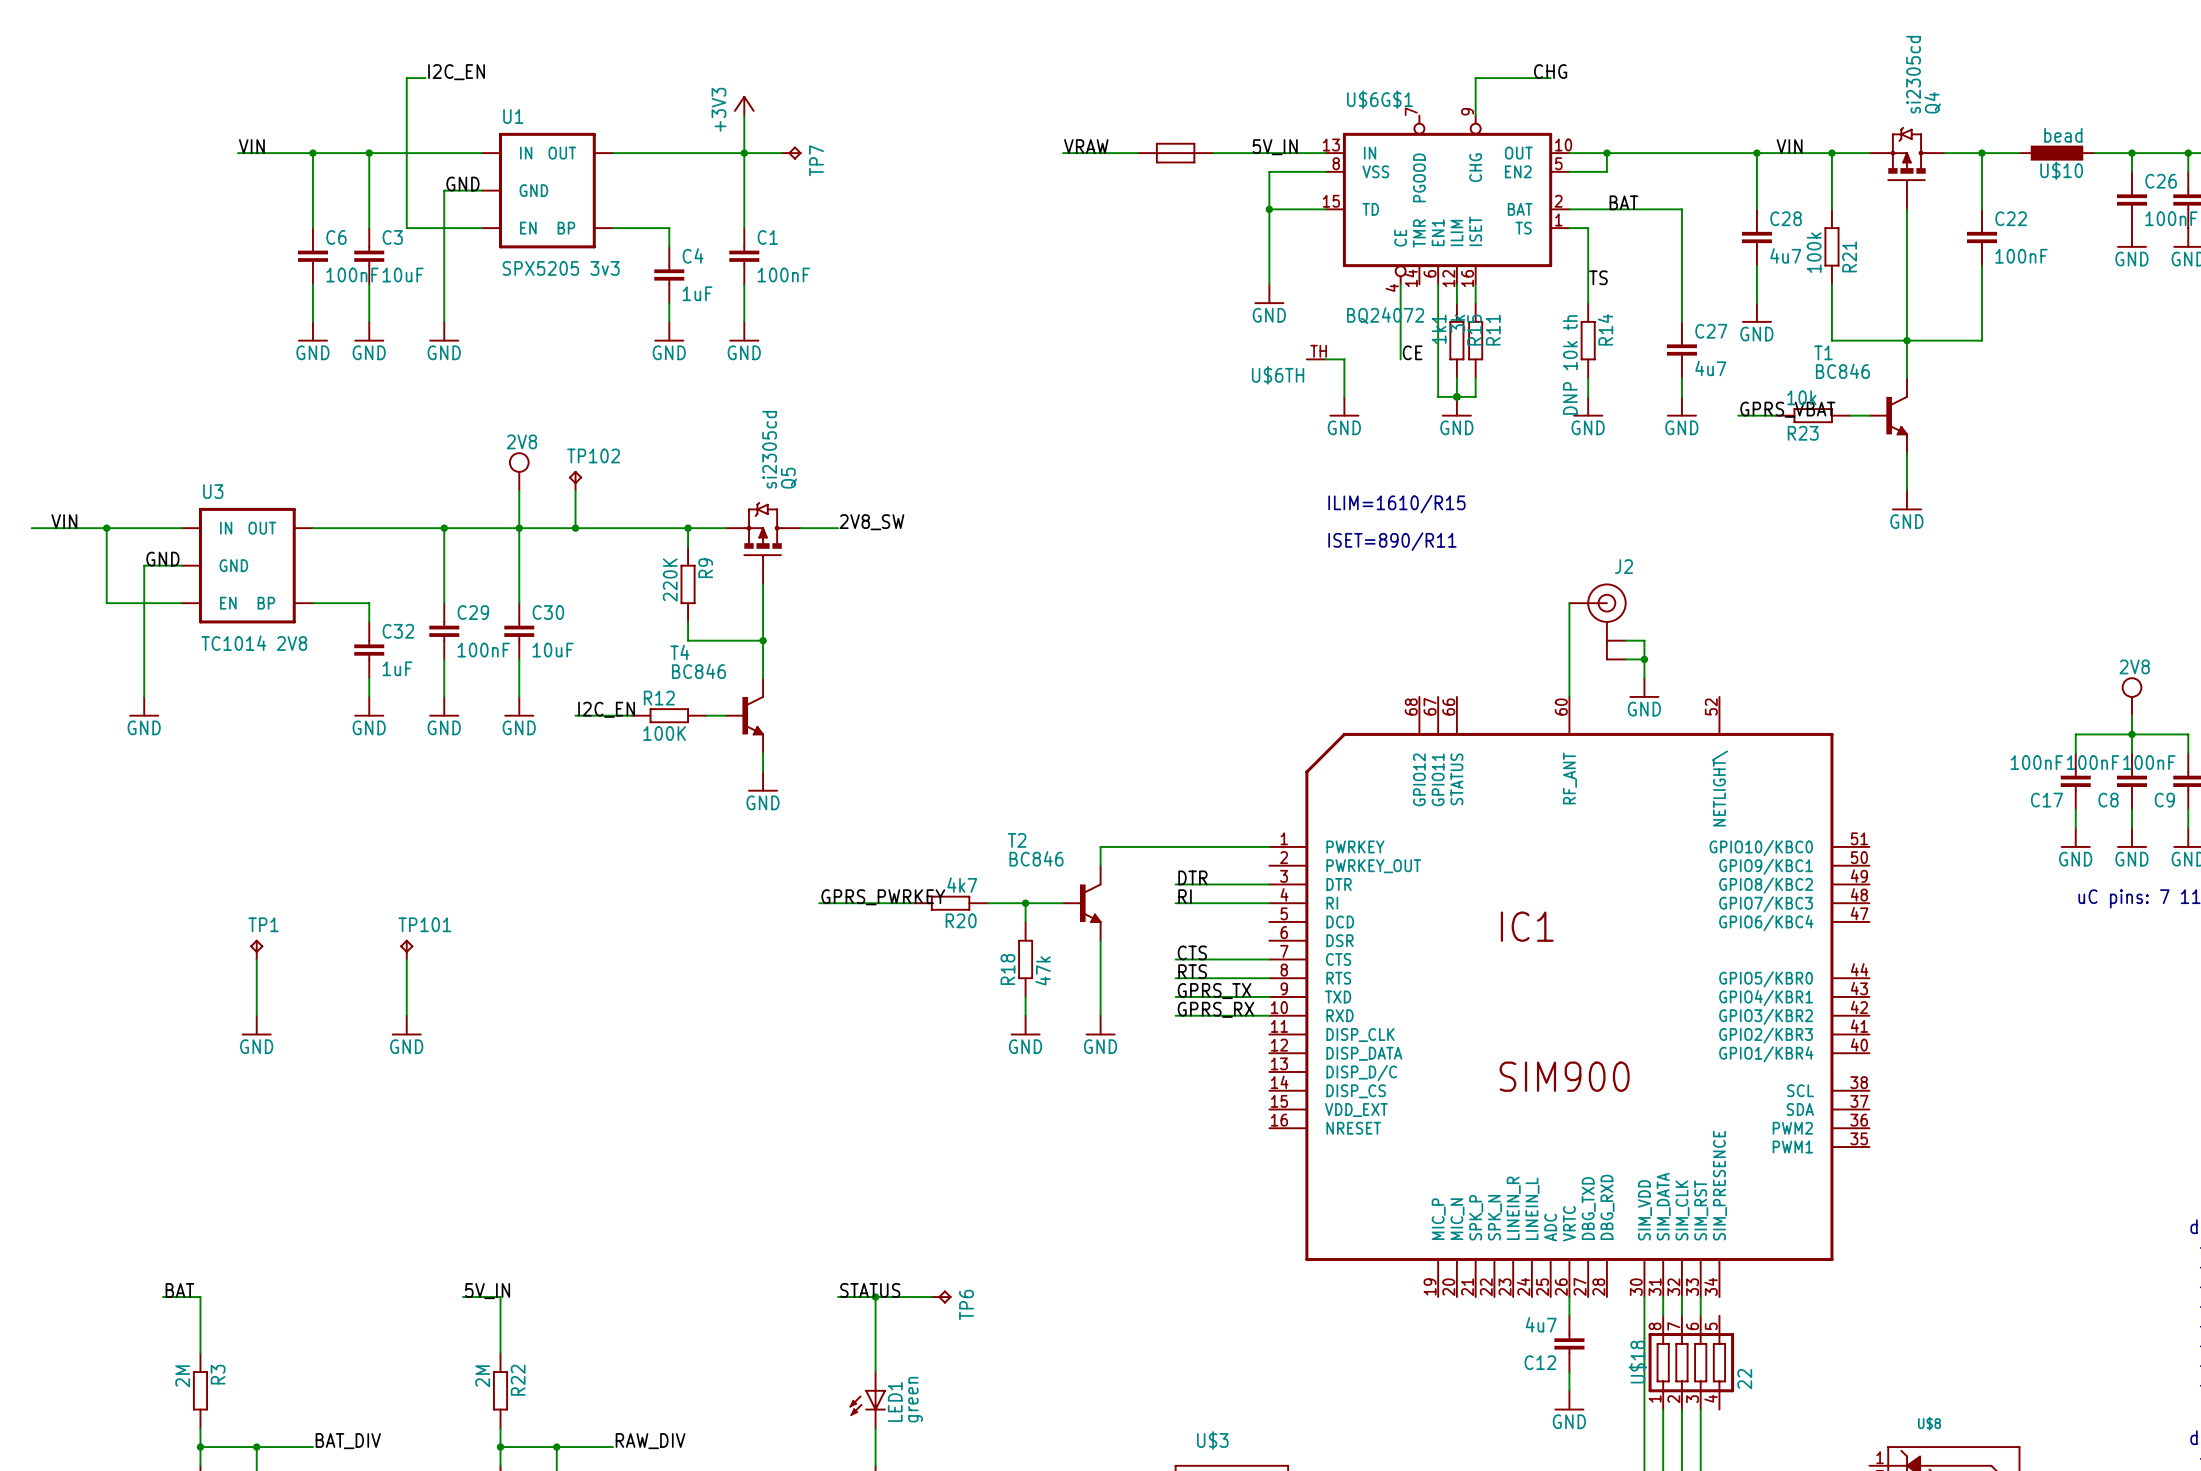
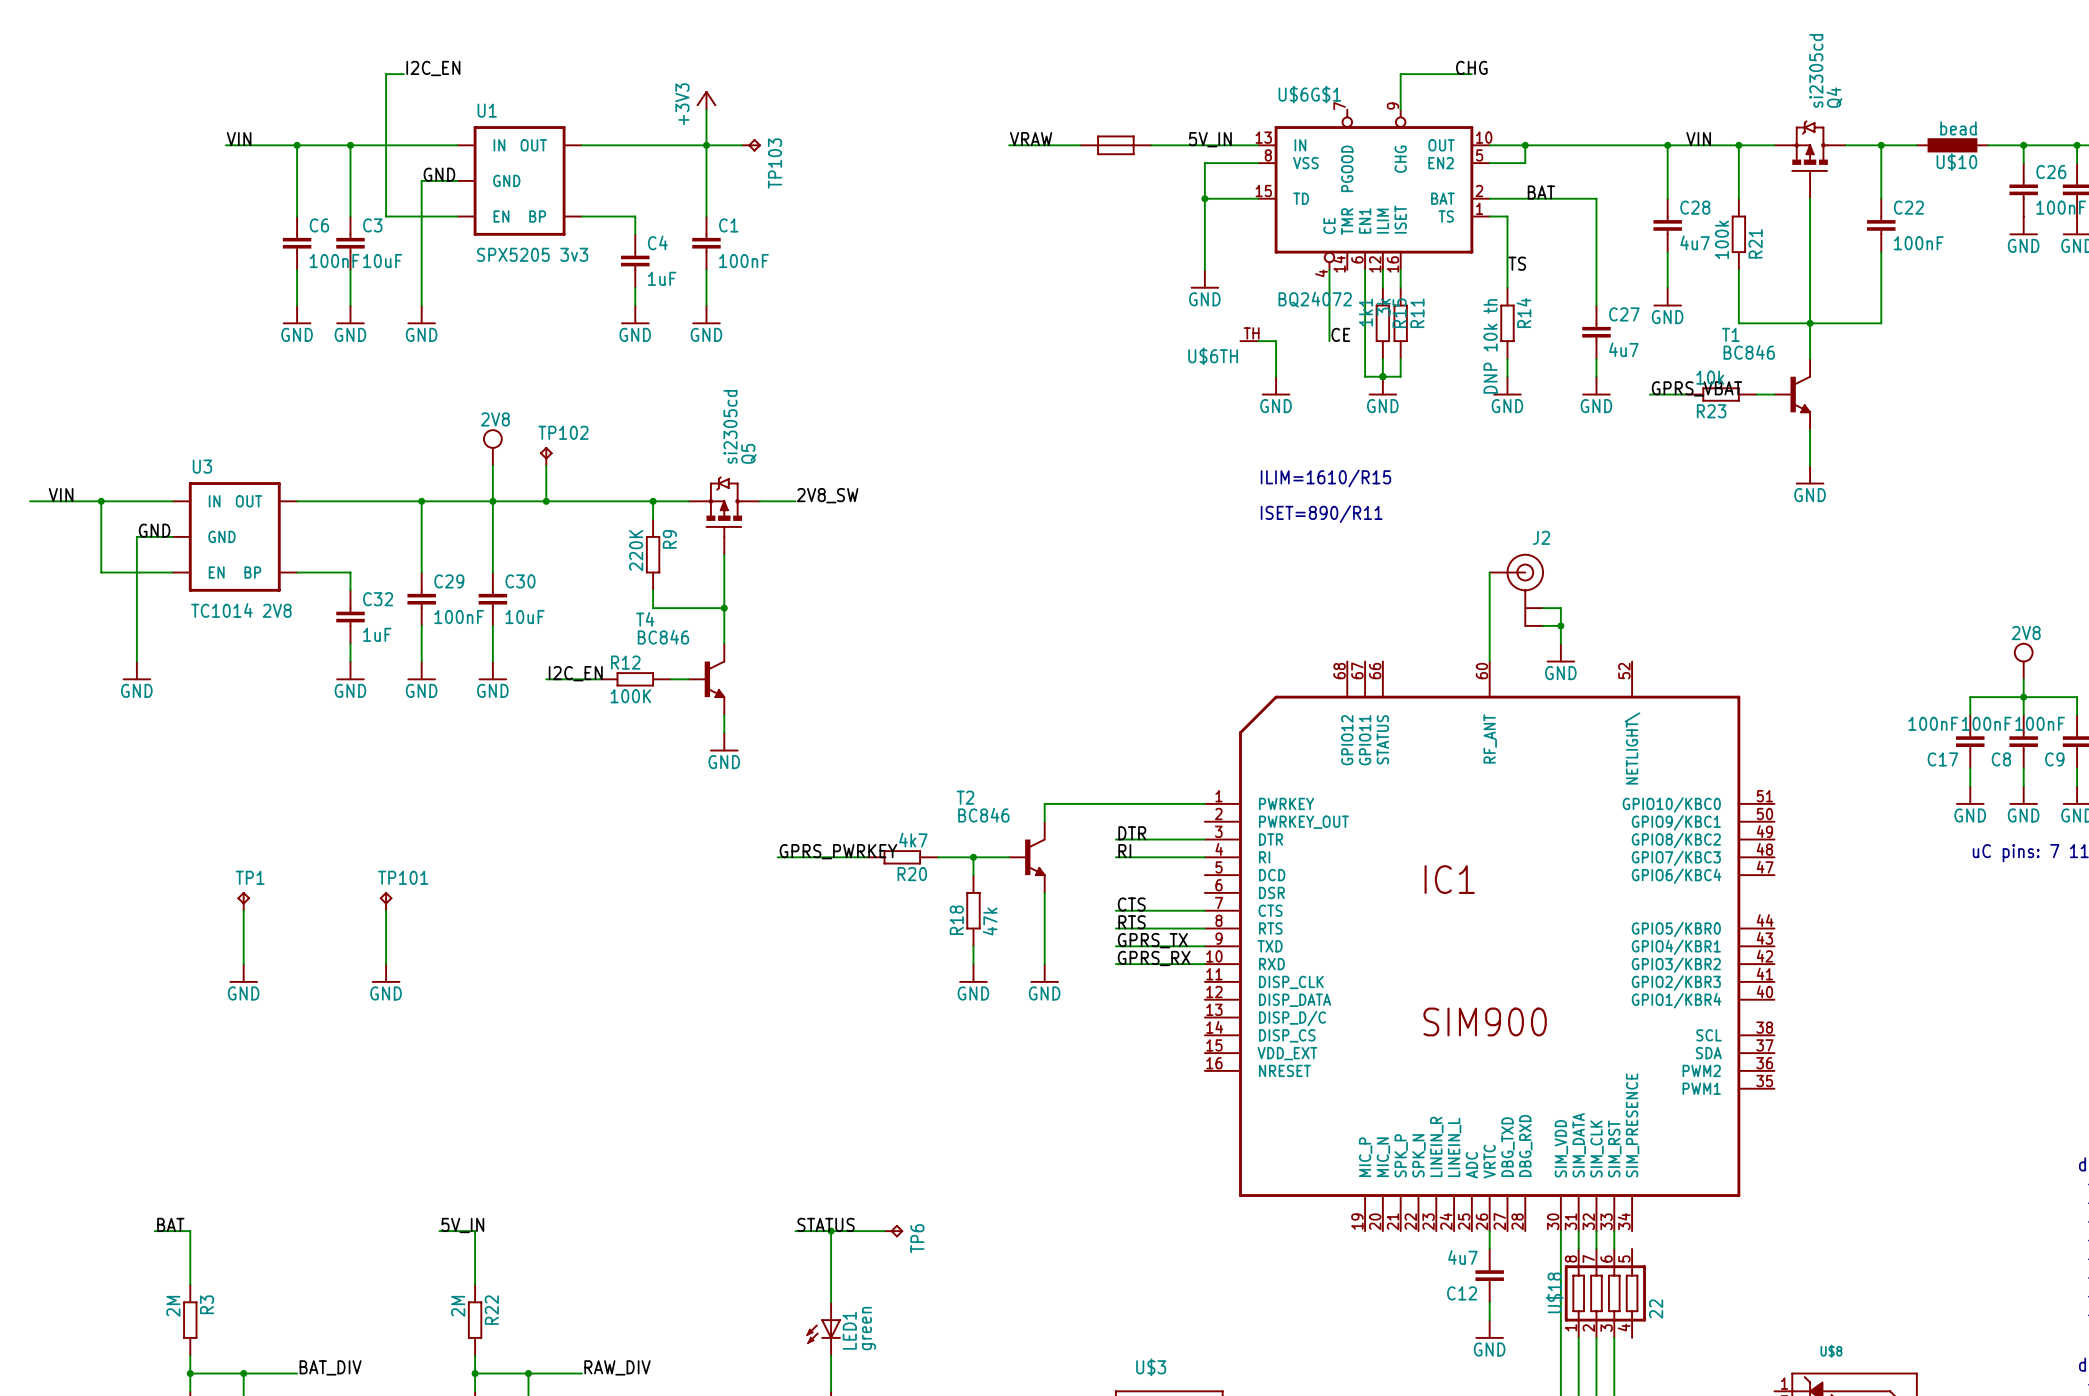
TP7 name: TP7 (816, 160) -> TP103 (775, 163)

